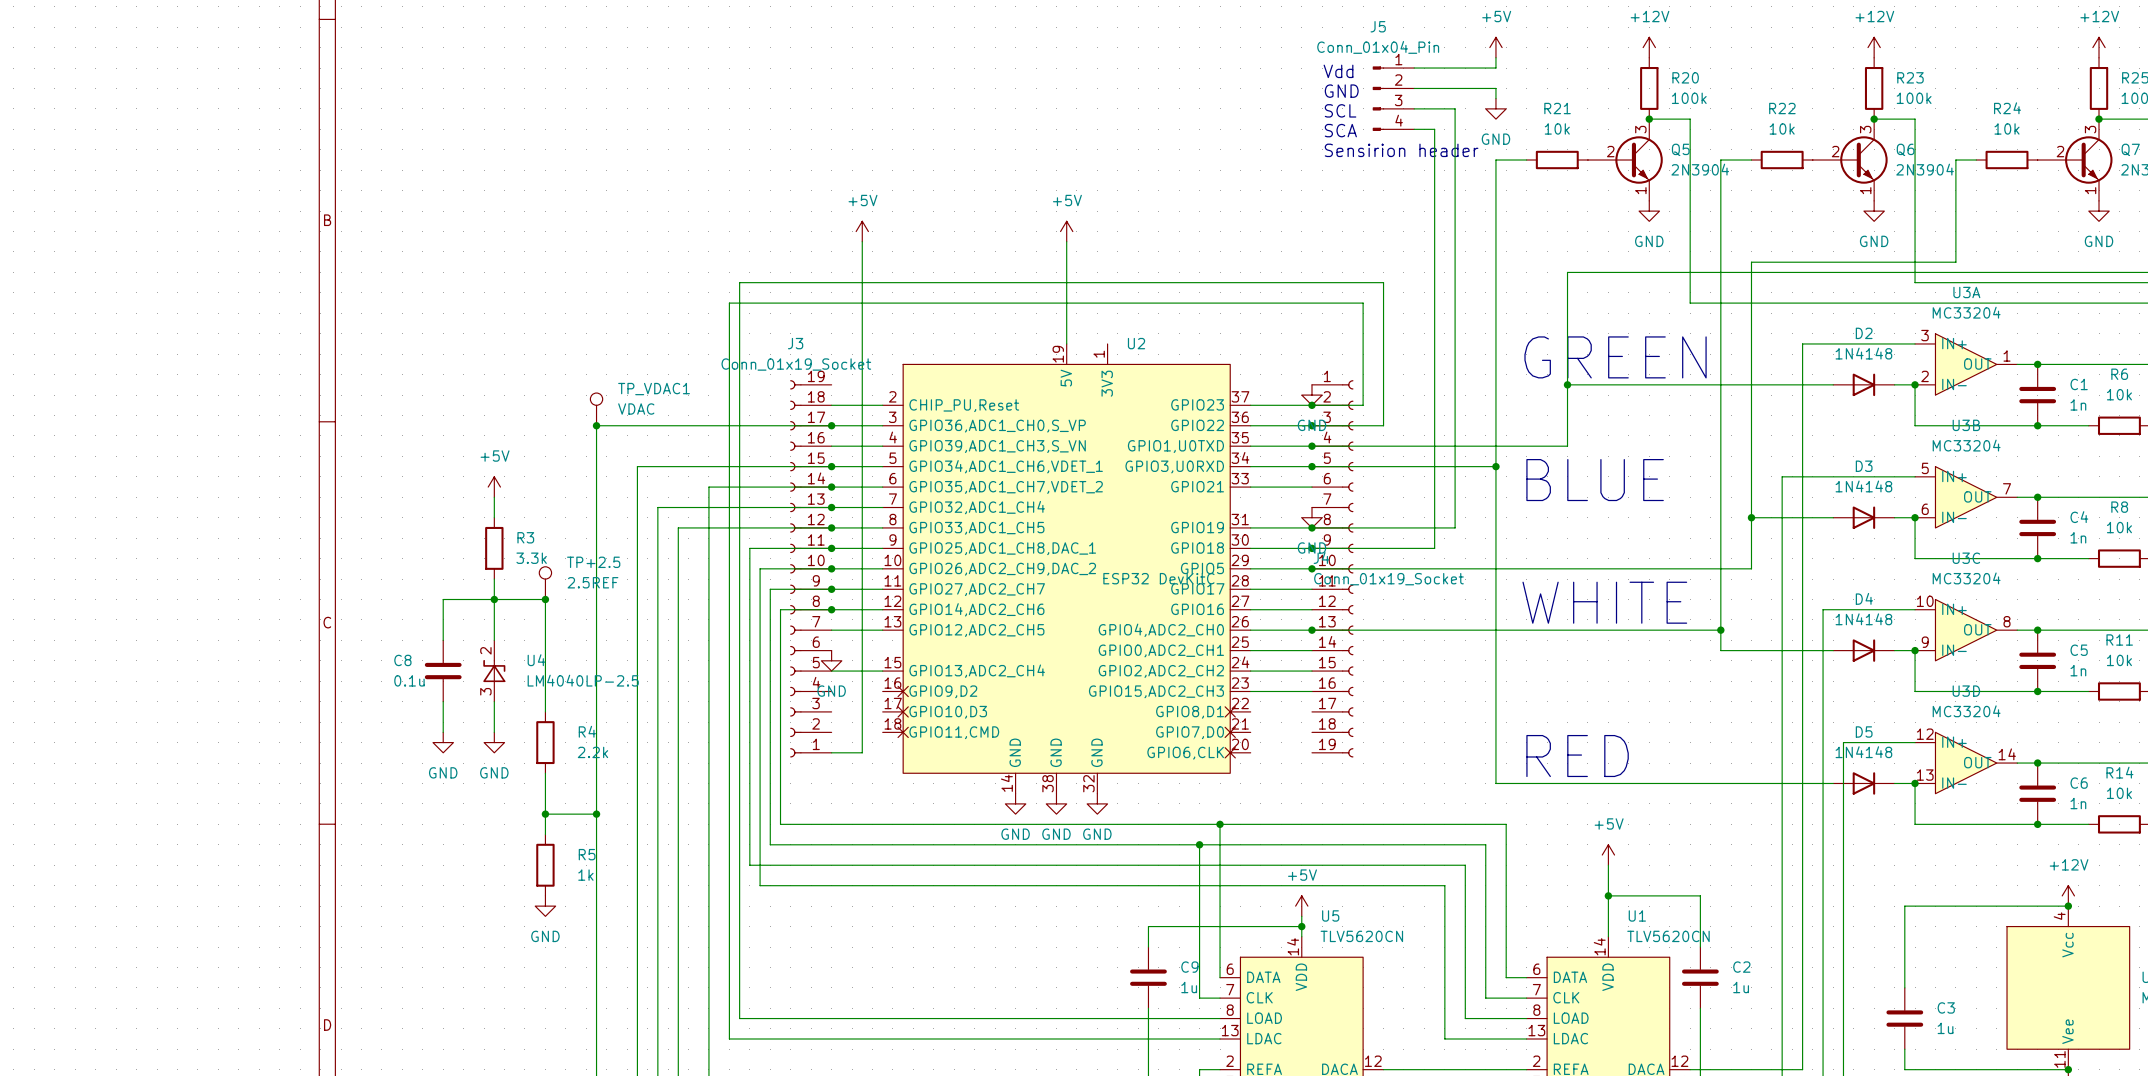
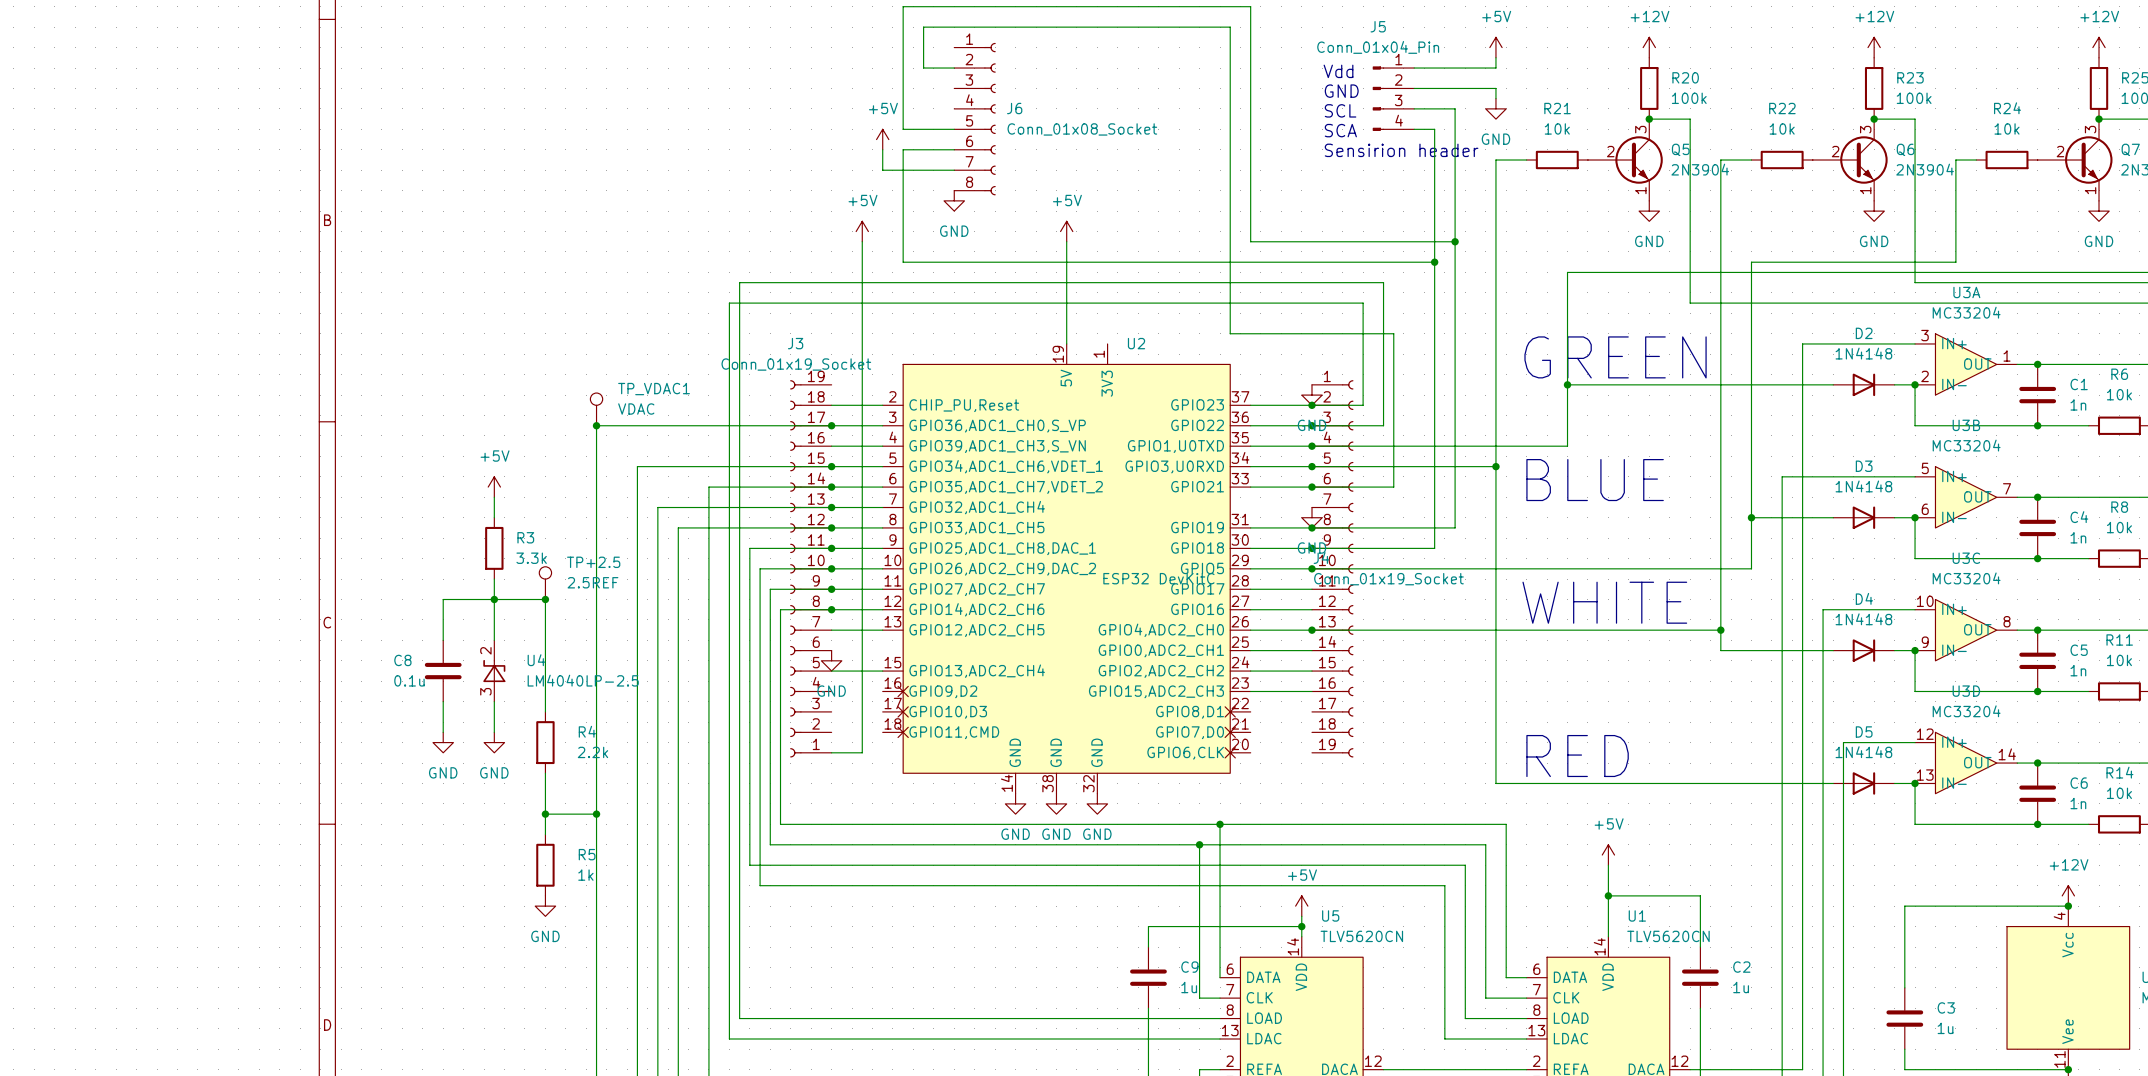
wire: none -> (954, 68) (923, 68) (923, 27) (1230, 27) (1230, 333) (1393, 333) (1393, 487) (1311, 487)
J6: none -> Conn_01x08_Socket (975, 119)
wire: none -> (954, 129) (903, 129) (903, 6) (1250, 6) (1250, 241) (1455, 241)
power symbol: none -> +5V (882, 139)
wire: none -> (882, 149) (882, 170) (954, 170)
wire: none -> (954, 149) (903, 149) (903, 262) (1434, 262)
power symbol: none -> GND (954, 200)
junction: none -> (1455, 241)
junction: none -> (1434, 262)
junction: none -> (1311, 487)

